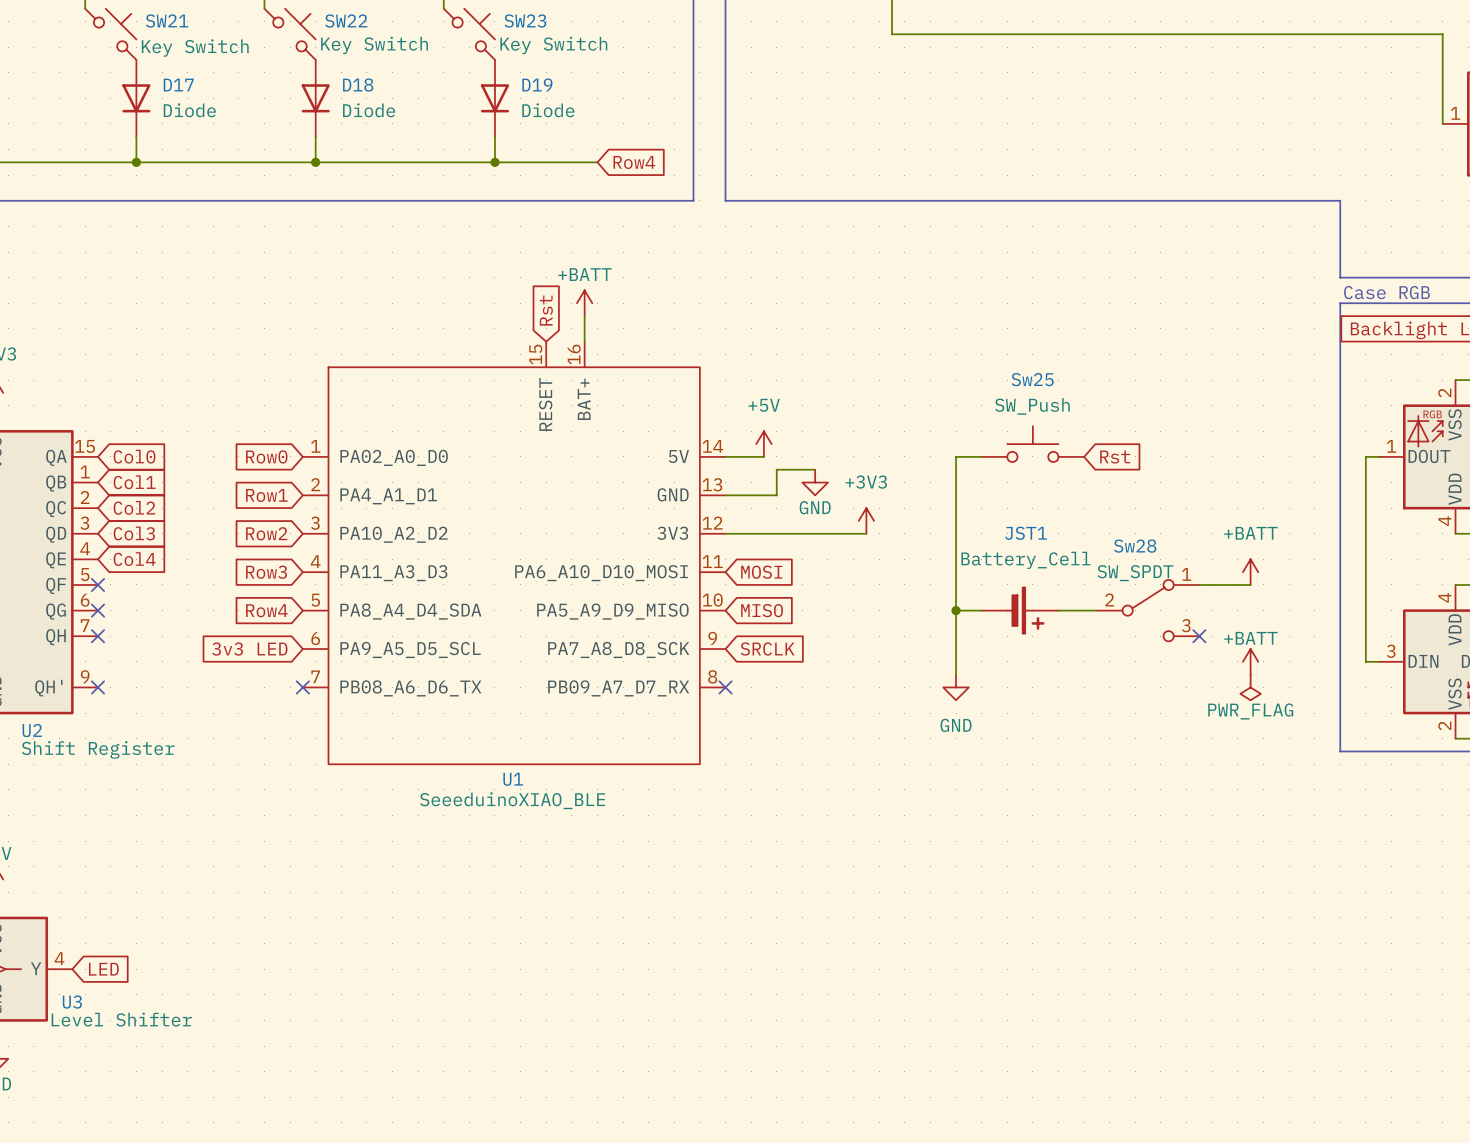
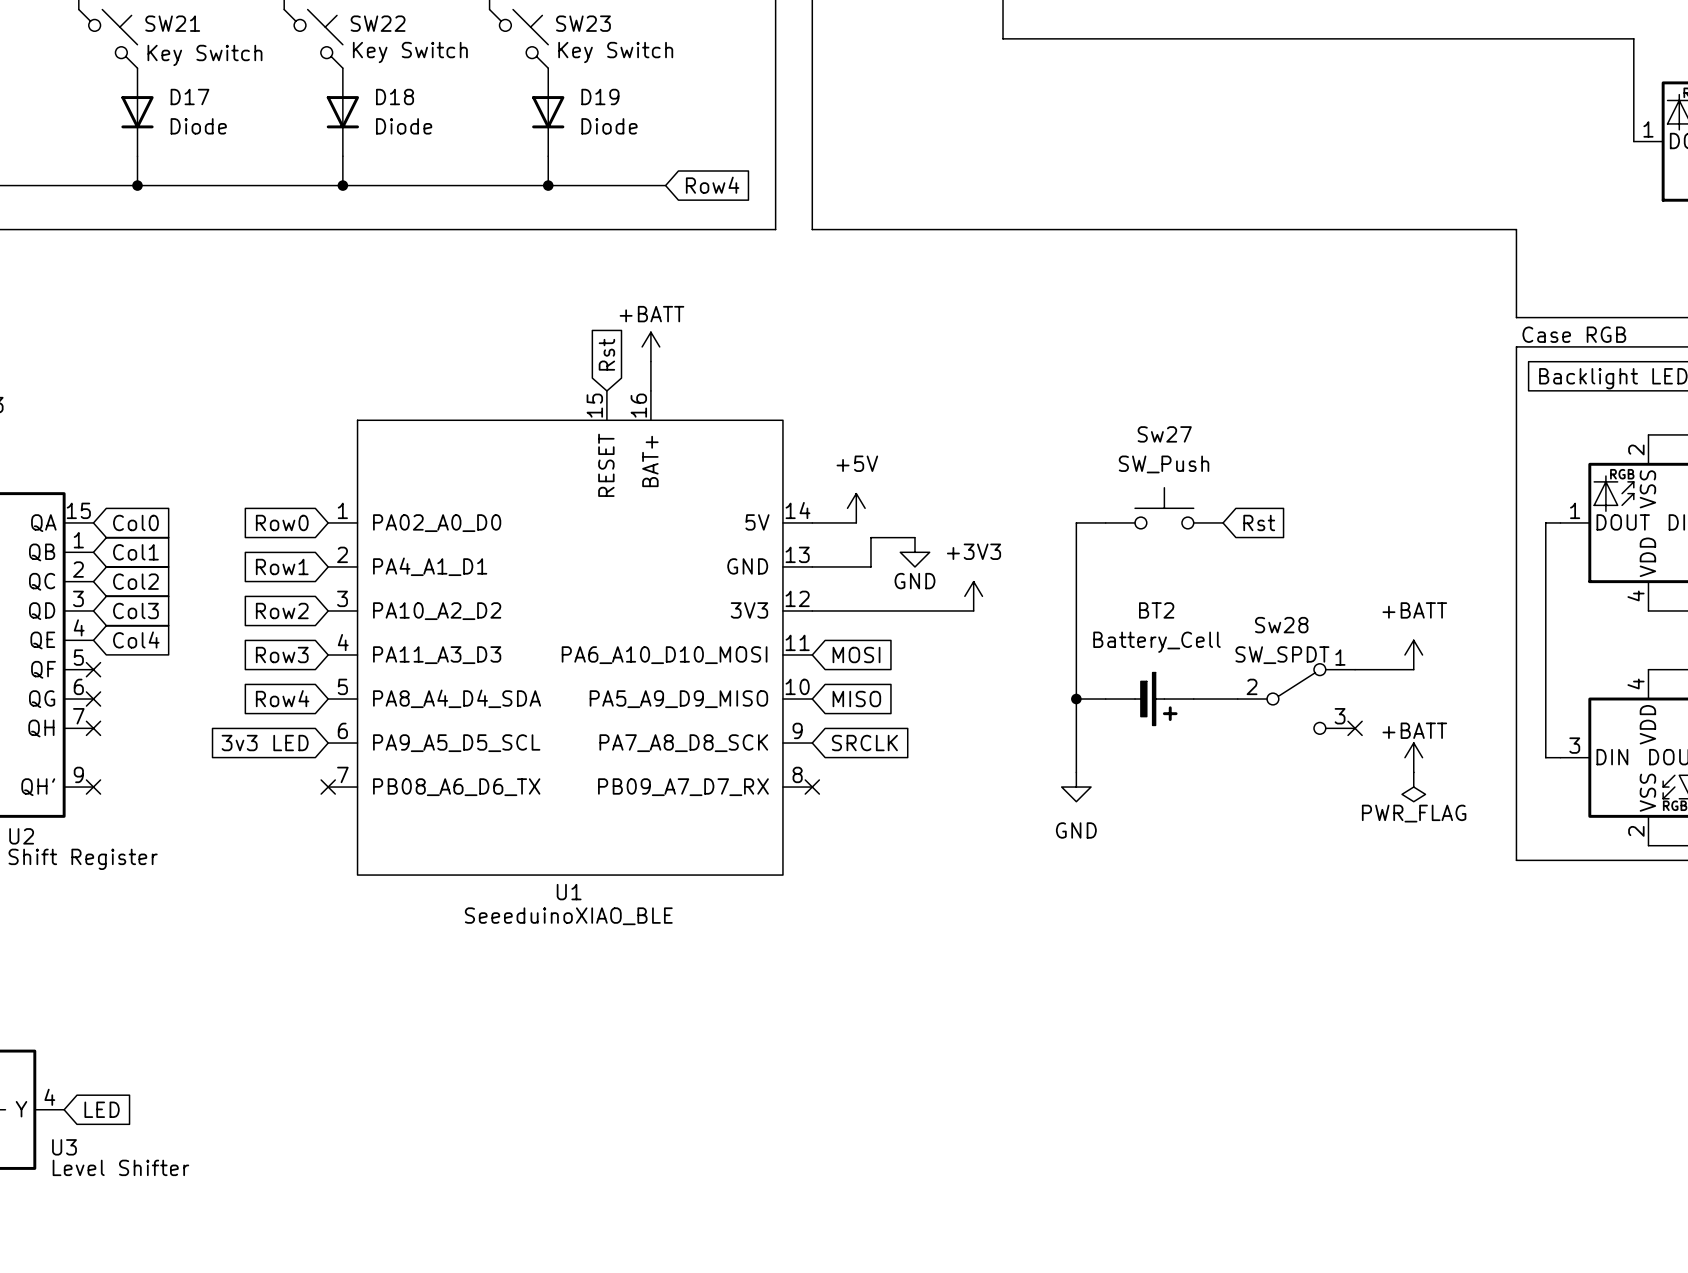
Sw25 name: Sw25 (1032, 379) -> Sw27 (1164, 434)
JST1 name: JST1 (1026, 533) -> BT2 (1156, 610)

